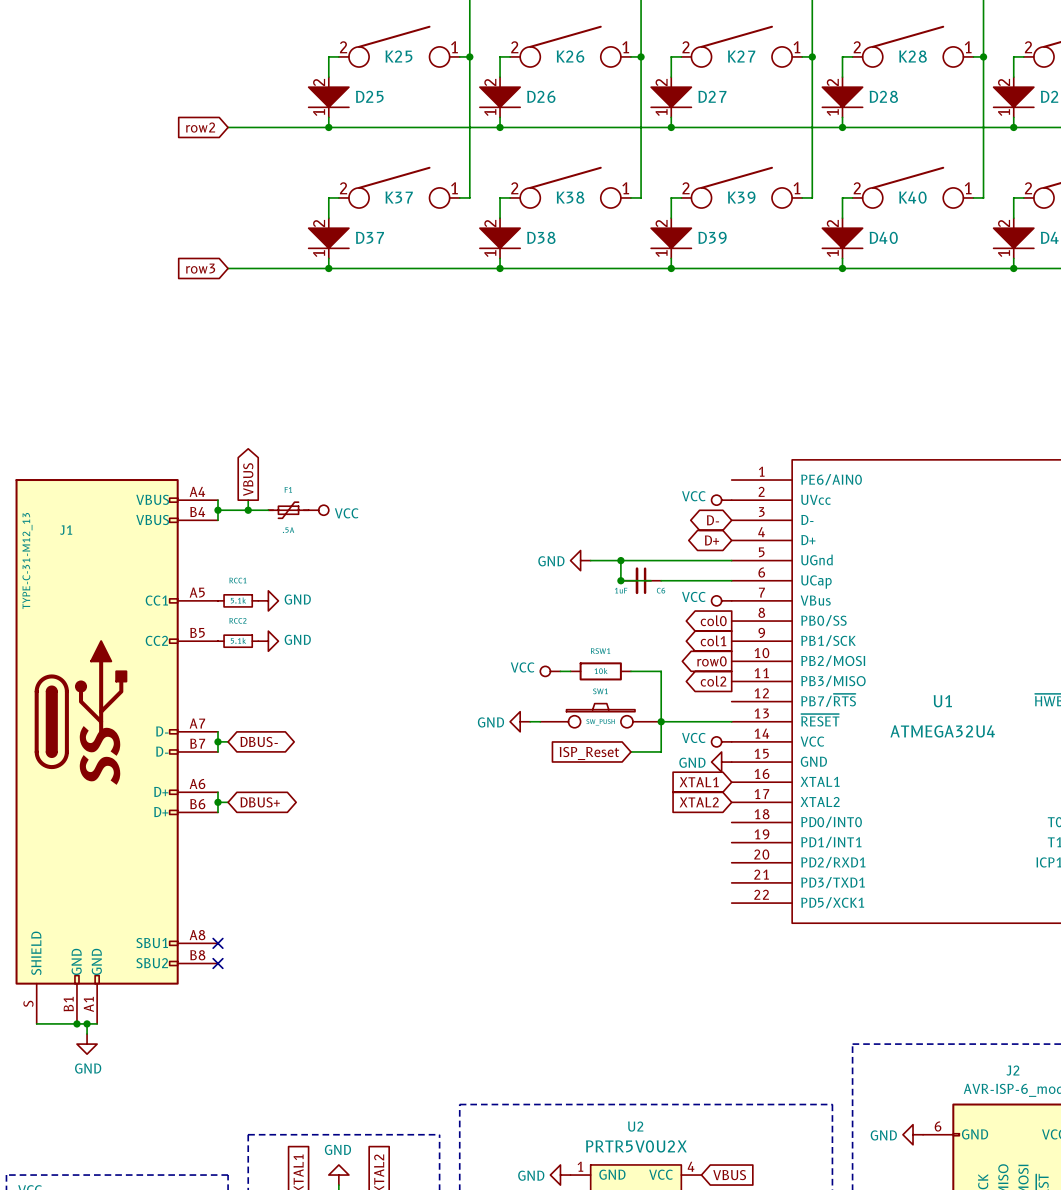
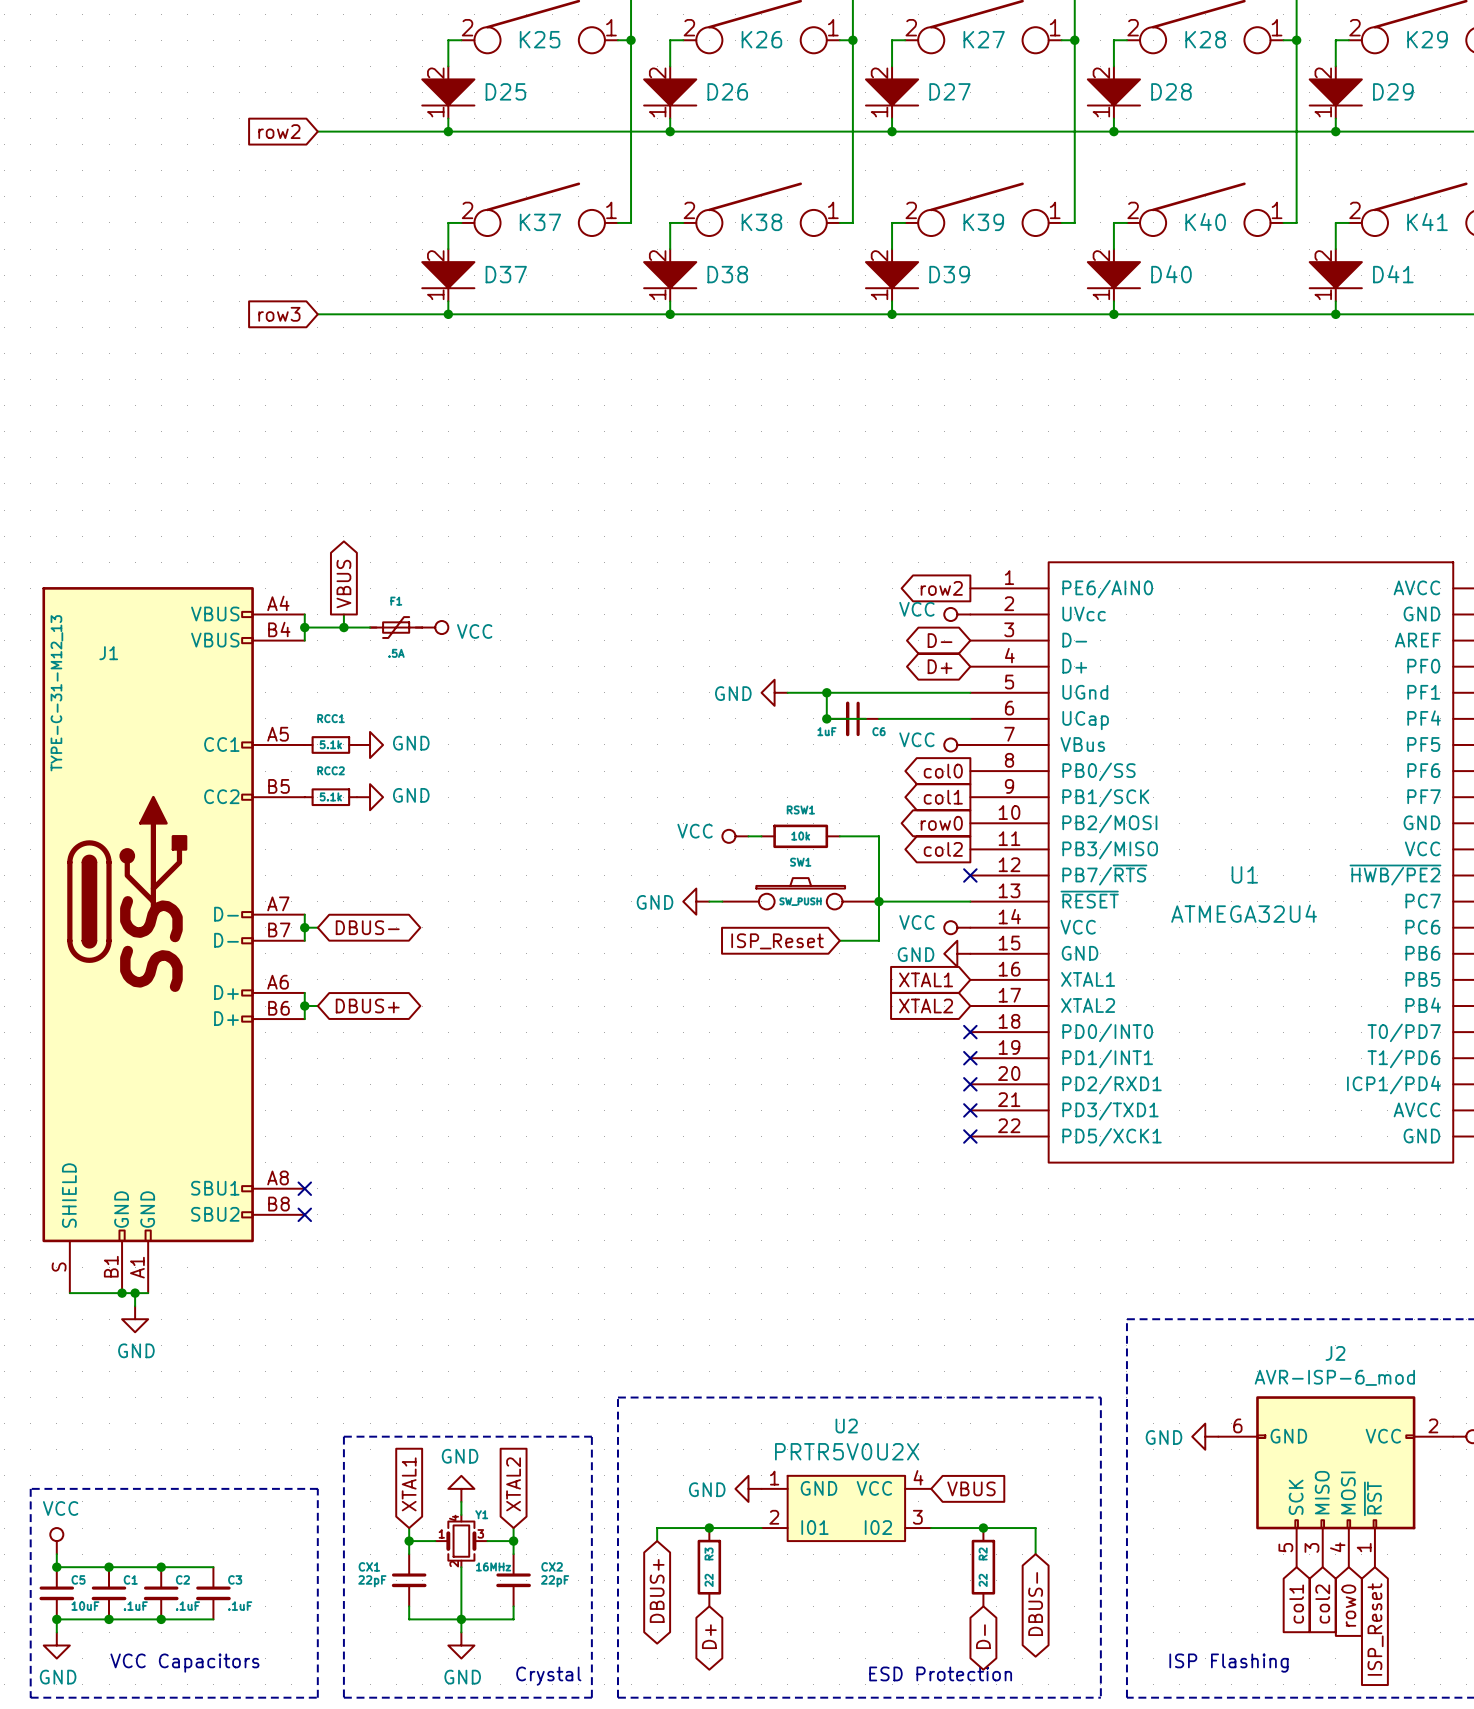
global label: none -> row2 (941, 588)
no-connect mark: none -> (970, 875)
no-connect mark: none -> (970, 1032)
no-connect mark: none -> (970, 1058)
no-connect mark: none -> (970, 1084)
no-connect mark: none -> (970, 1110)
no-connect mark: none -> (970, 1136)

